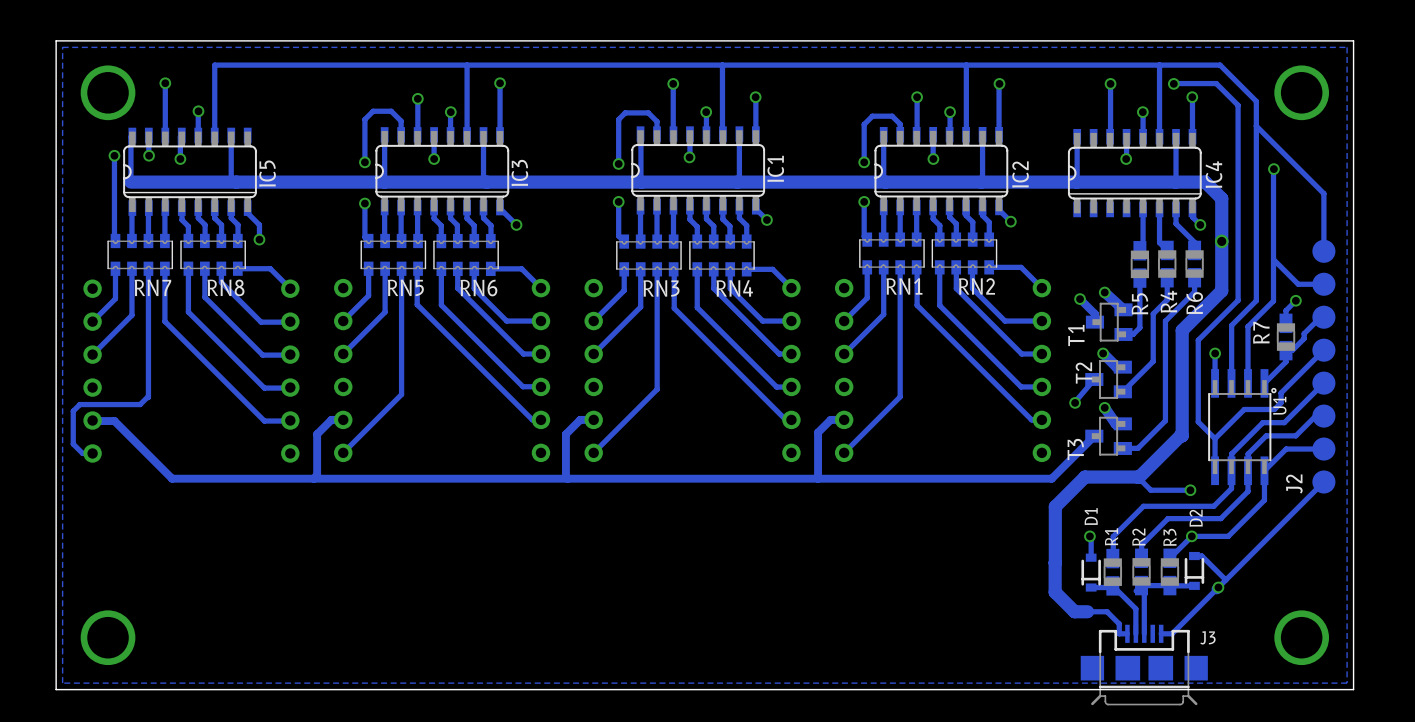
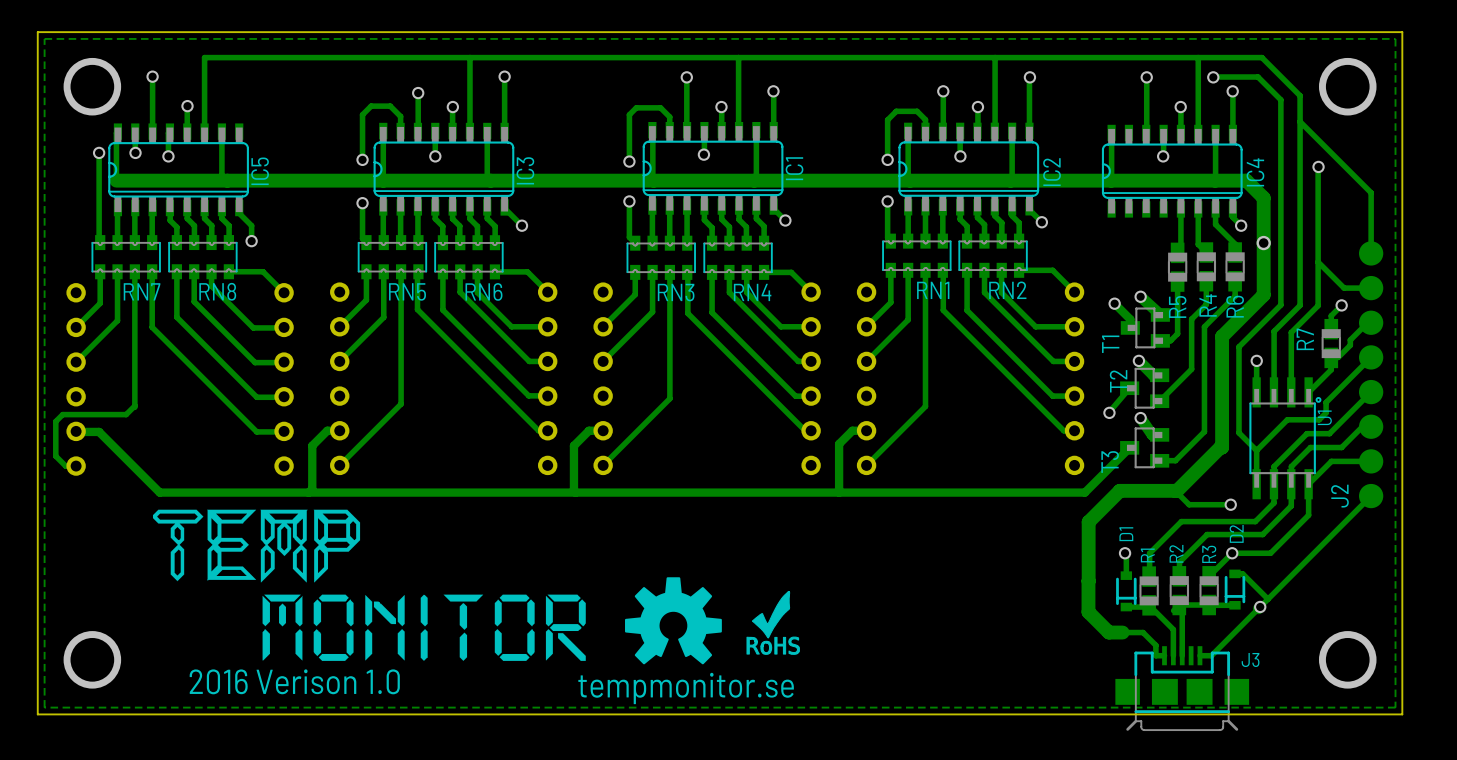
drawing: none -> [152, 509, 586, 661]
drawing: none -> [625, 577, 722, 665]
drawing: none -> [746, 590, 800, 655]
text: none -> 2016 Verison 1.0 (294, 681)
text: none -> tempmonitor.se (686, 688)

